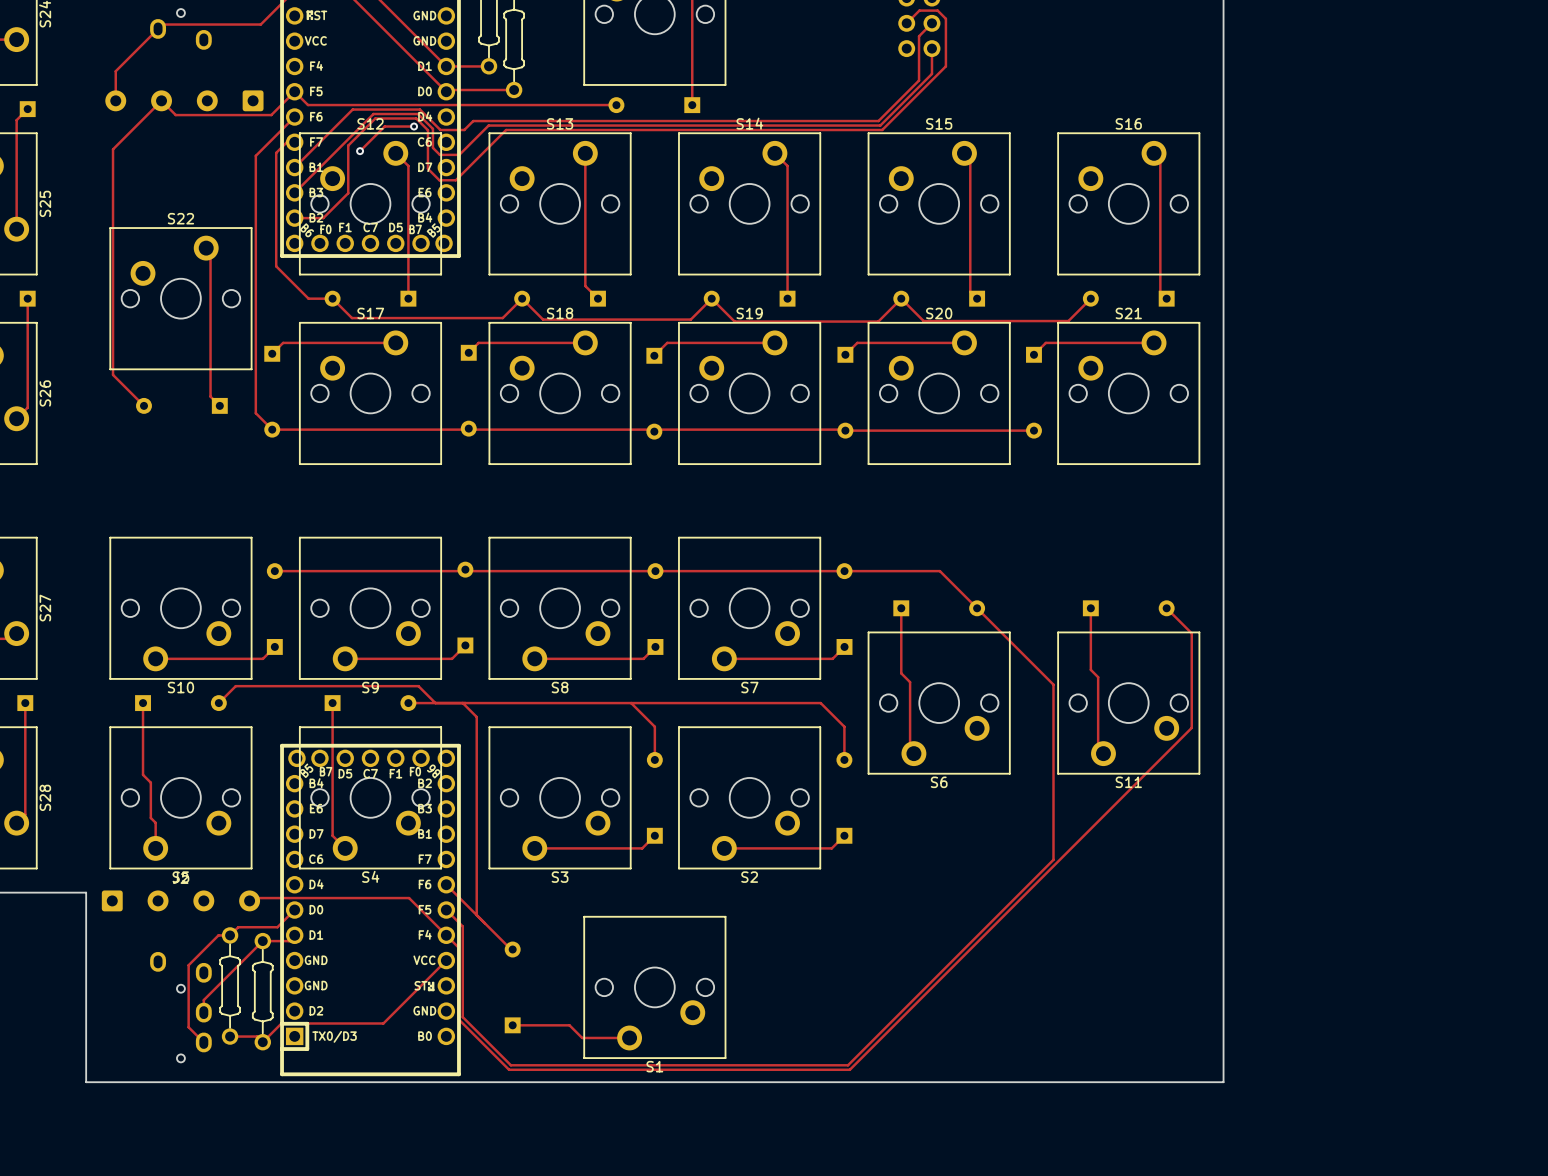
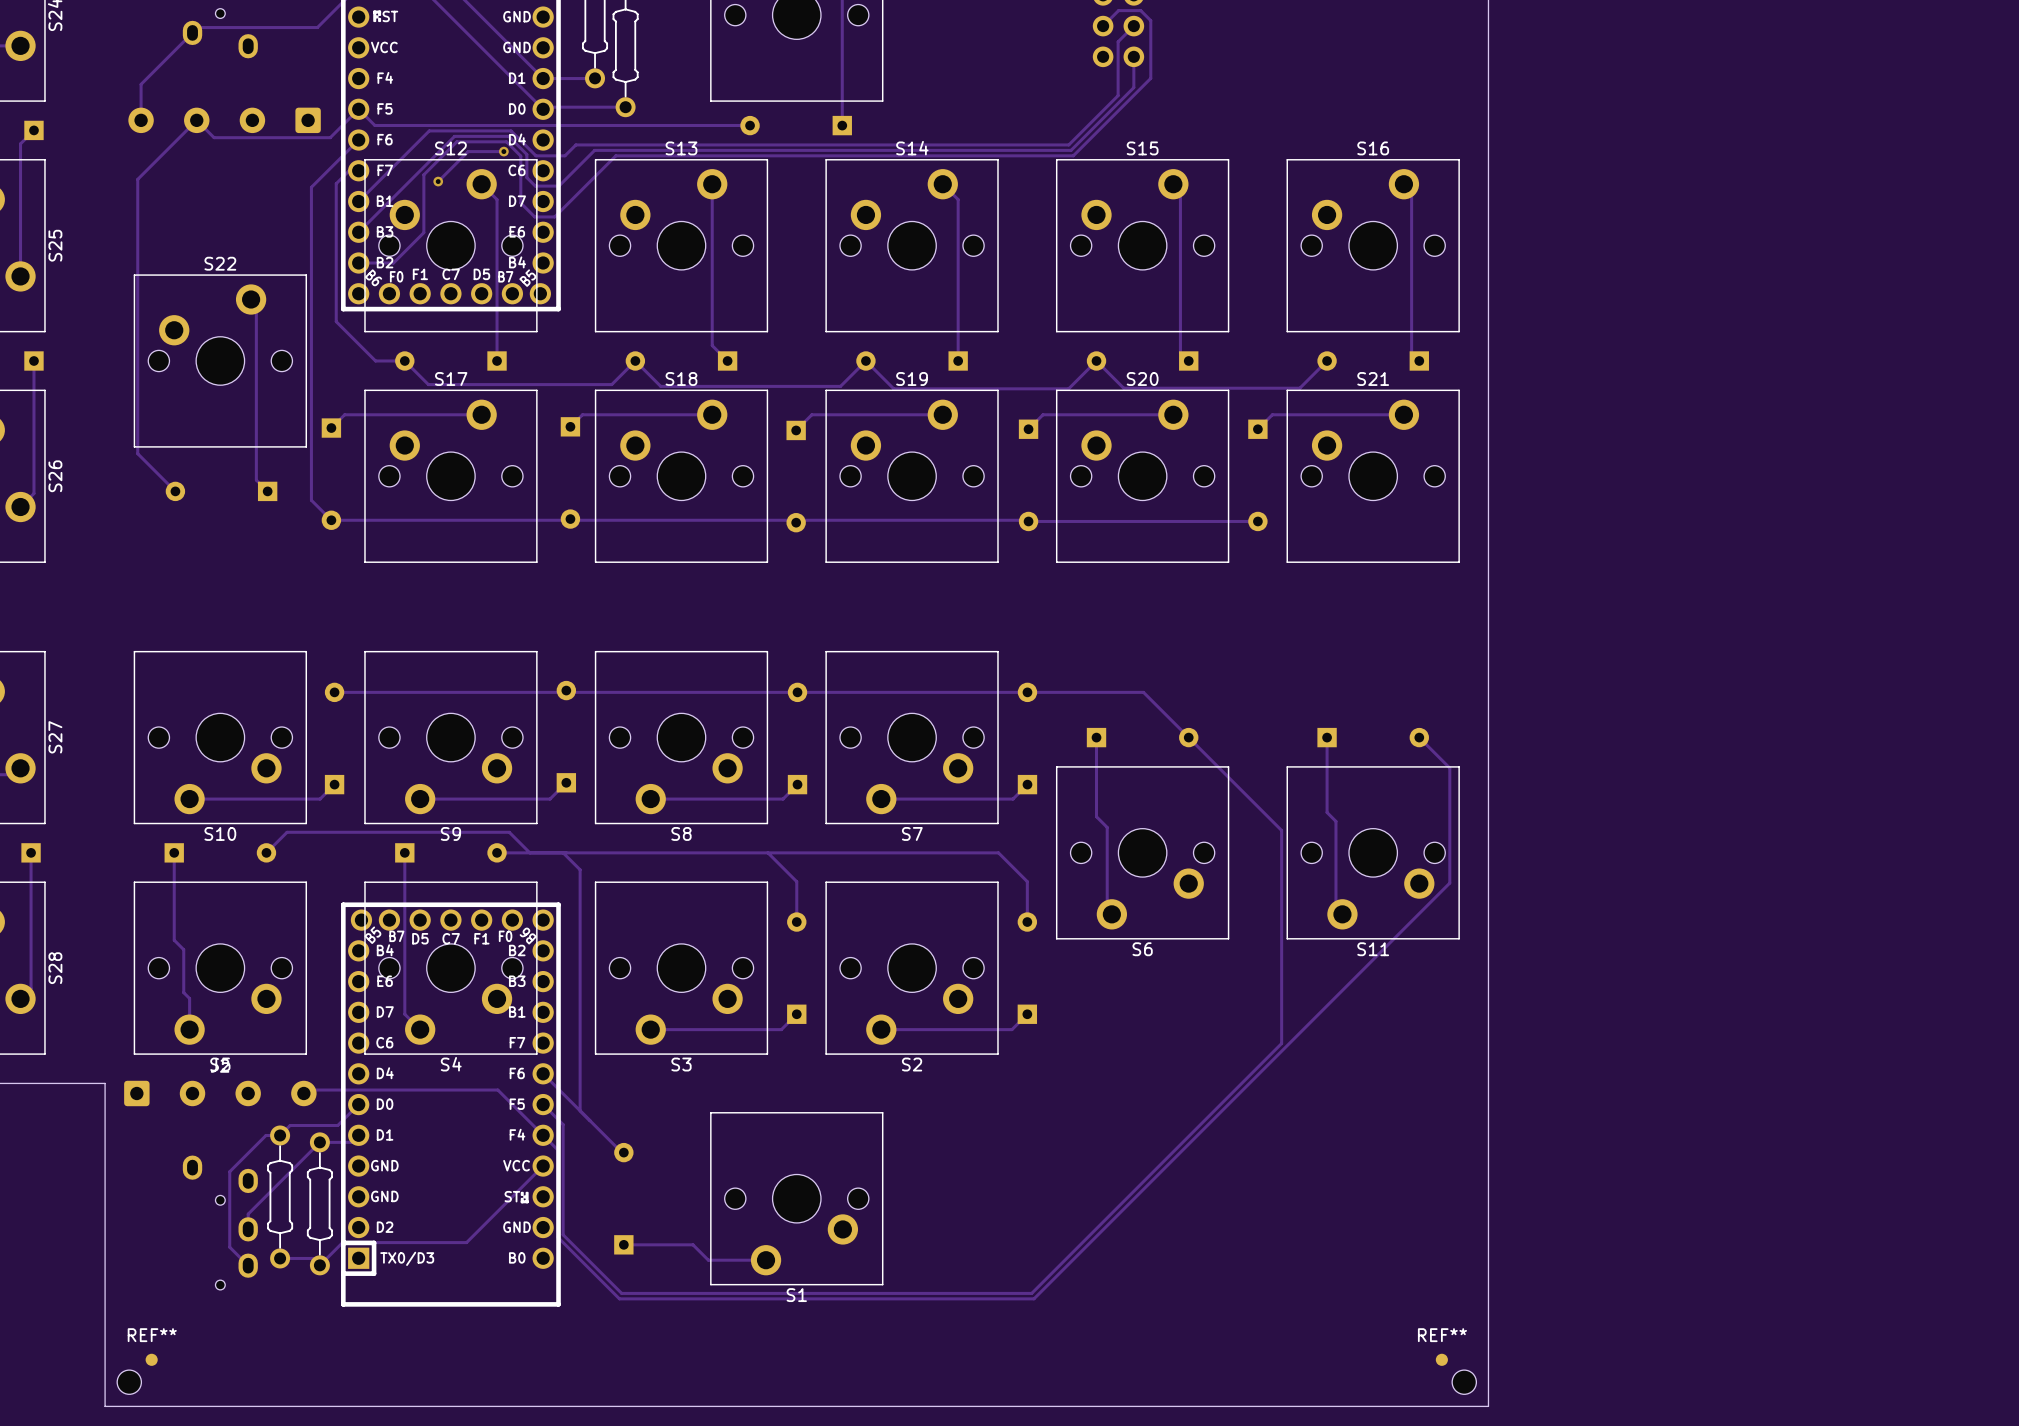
board edge: (86, 1082) (1223, 1082) -> (105, 1314) (105, 1406) (1488, 1406) (1488, 1314)
REF**: none -> (151, 1359)
REF**: none -> (1441, 1359)
part: none -> (129, 1382)
part: none -> (1464, 1382)

